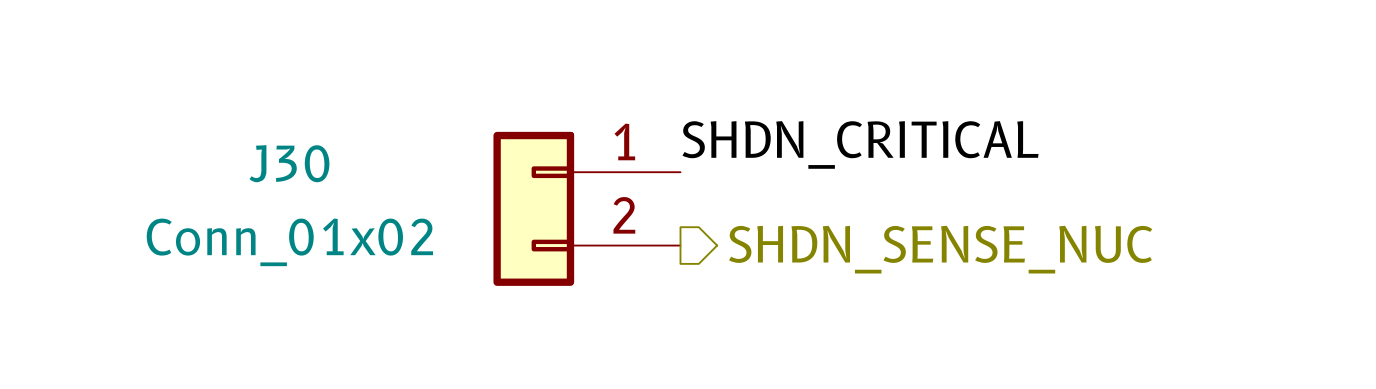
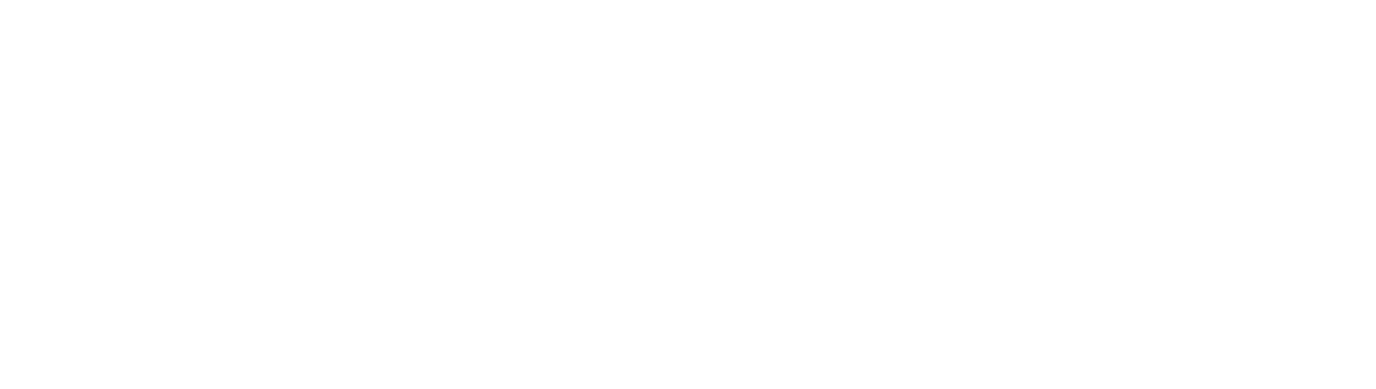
label: SHDN_CRITICAL (860, 144) -> none
J30: Conn_01x02 (586, 208) -> none
hierarchical label: SHDN_SENSE_NUC (940, 249) -> none

